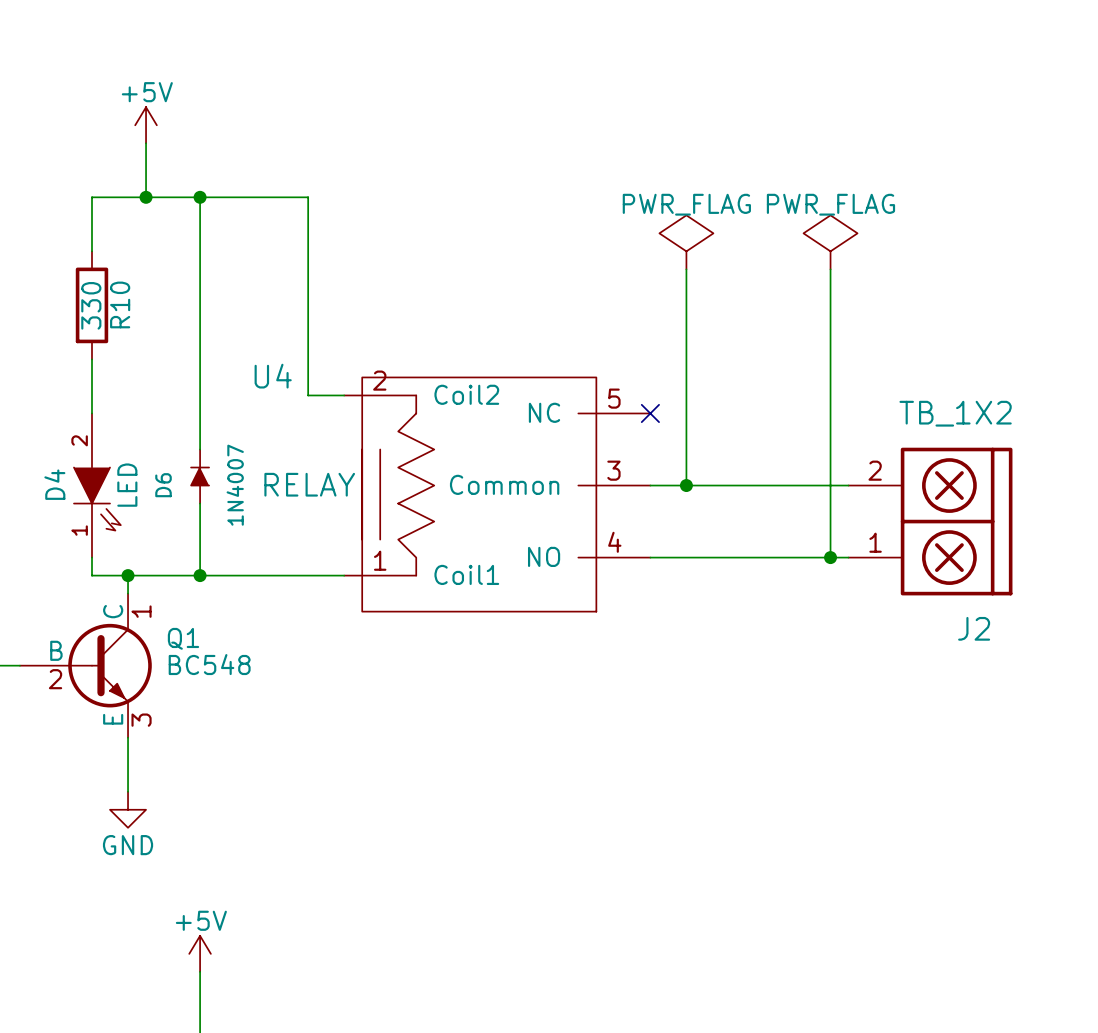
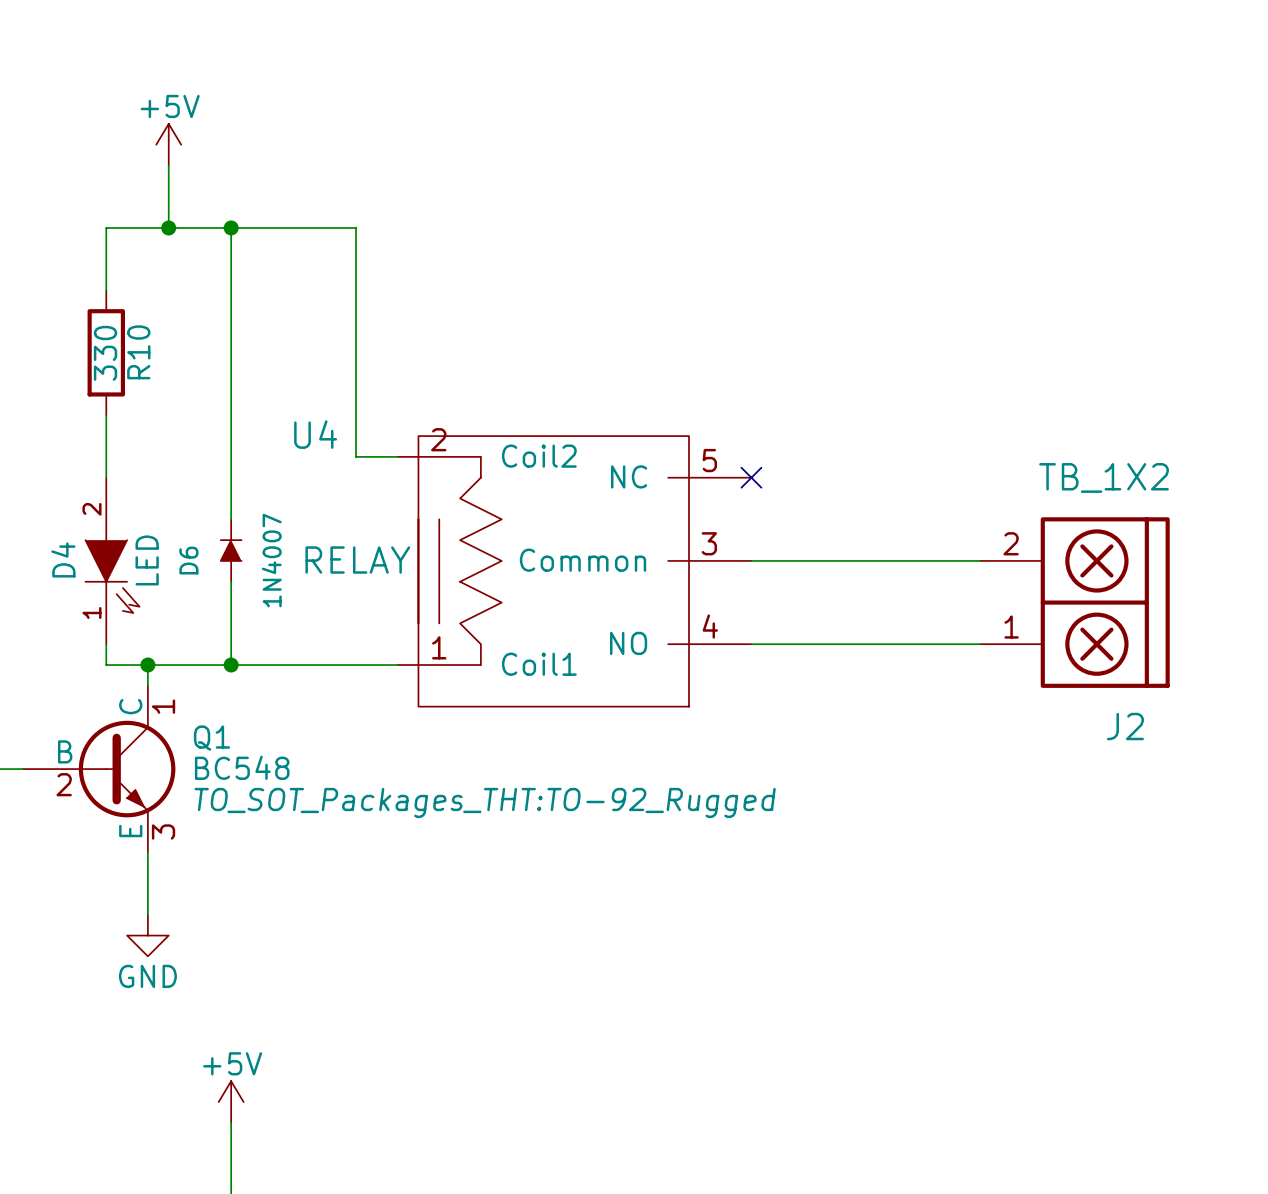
power symbol: PWR_FLAG (686, 242) -> none
power symbol: PWR_FLAG (830, 242) -> none
wire: (686, 269) (686, 485) -> none
wire: (830, 269) (830, 557) -> none
junction: (686, 485) -> none
junction: (830, 557) -> none
Q1 text: none -> TO_SOT_Packages_THT:TO-92_Rugged (485, 802)

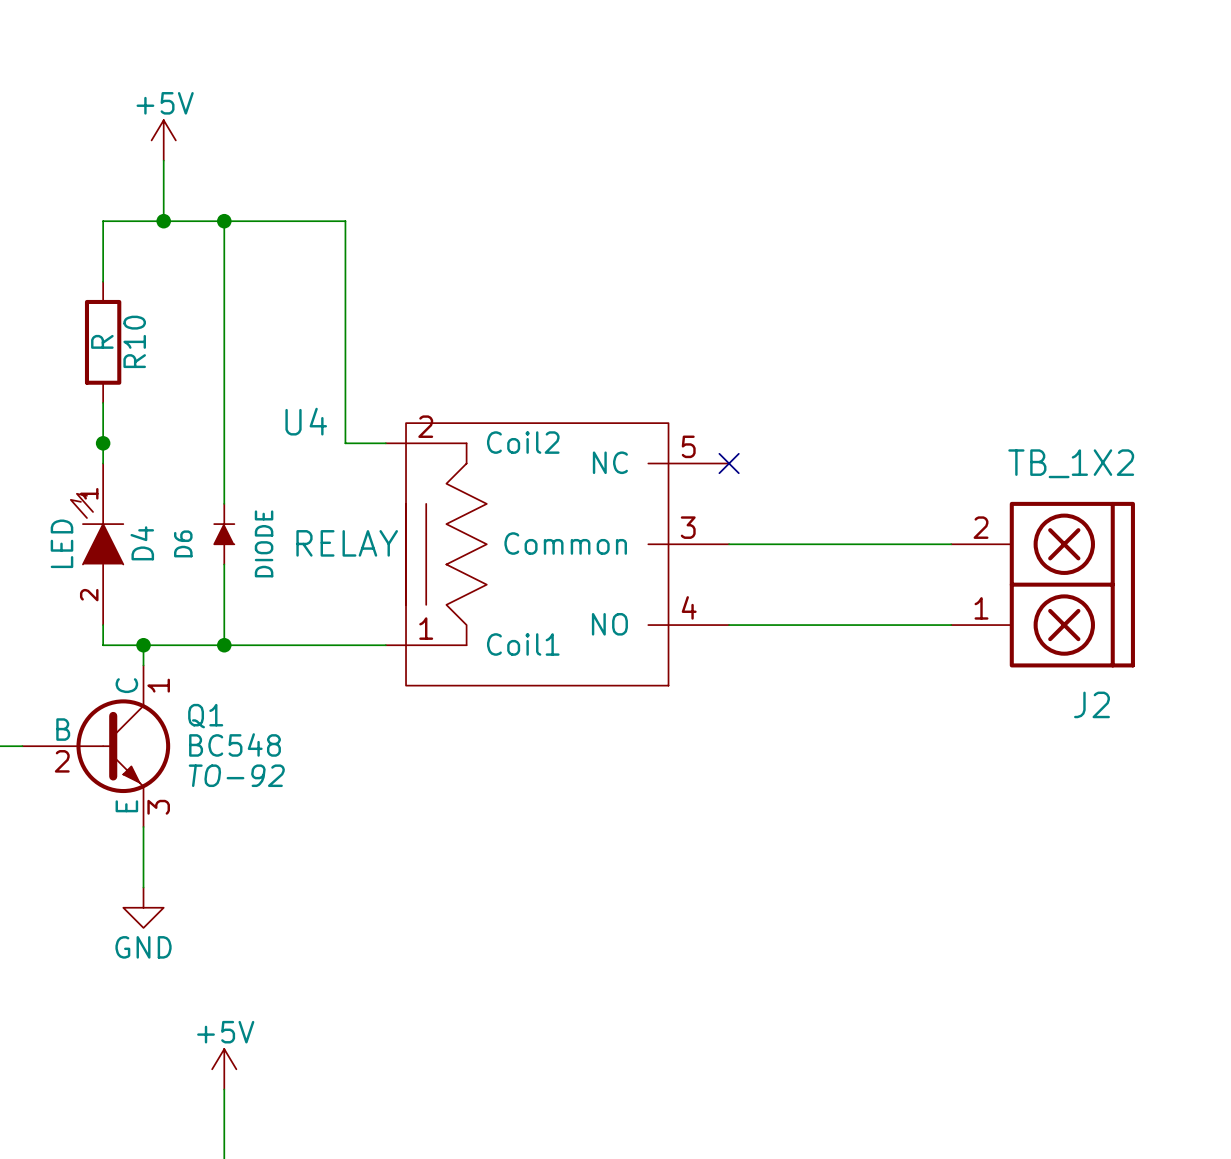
R10 value: 330 (105, 353) -> R (102, 341)
junction: none -> (103, 443)
D6 value: 1N4007 (271, 560) -> DIODE (264, 543)
D4 rotation: 0° (112, 576) -> 180° (97, 529)
Q1 text: TO_SOT_Packages_THT:TO-92_Rugged (485, 802) -> TO-92 (236, 775)

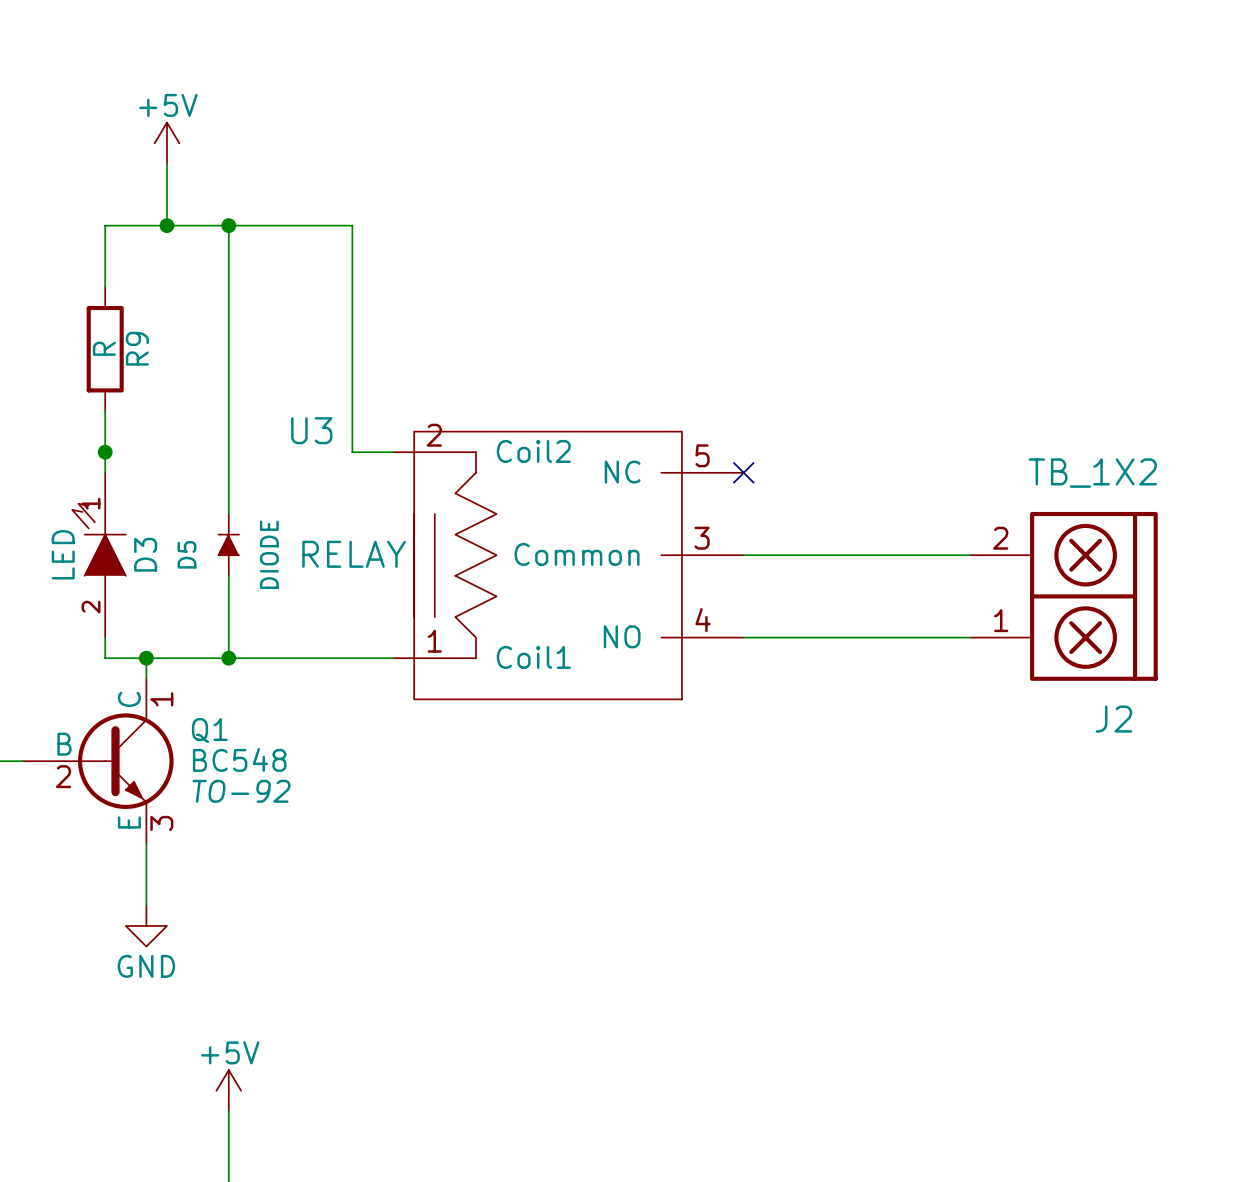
R10 name: R10 (134, 341) -> R9 (137, 348)
U4 name: U4 (306, 421) -> U3 (311, 430)
D4 name: D4 (142, 543) -> D3 (145, 554)
D6 name: D6 (183, 543) -> D5 (186, 554)

